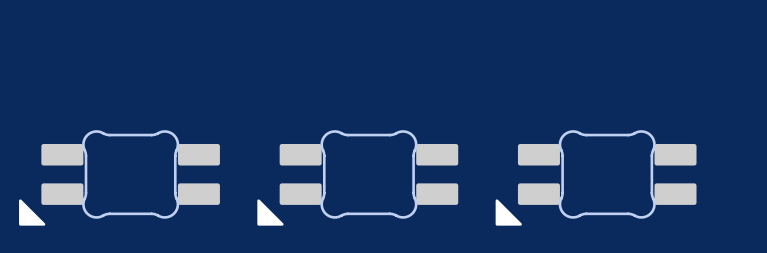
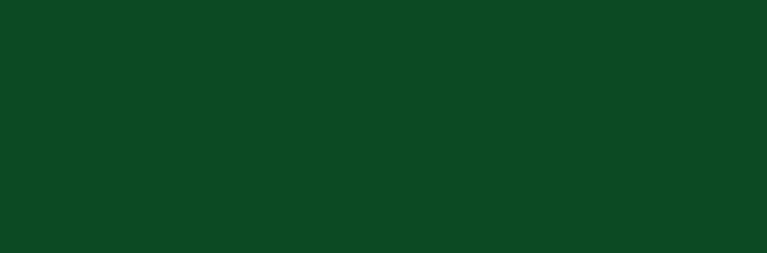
part: (119, 177) -> none
part: (357, 177) -> none
part: (596, 177) -> none

